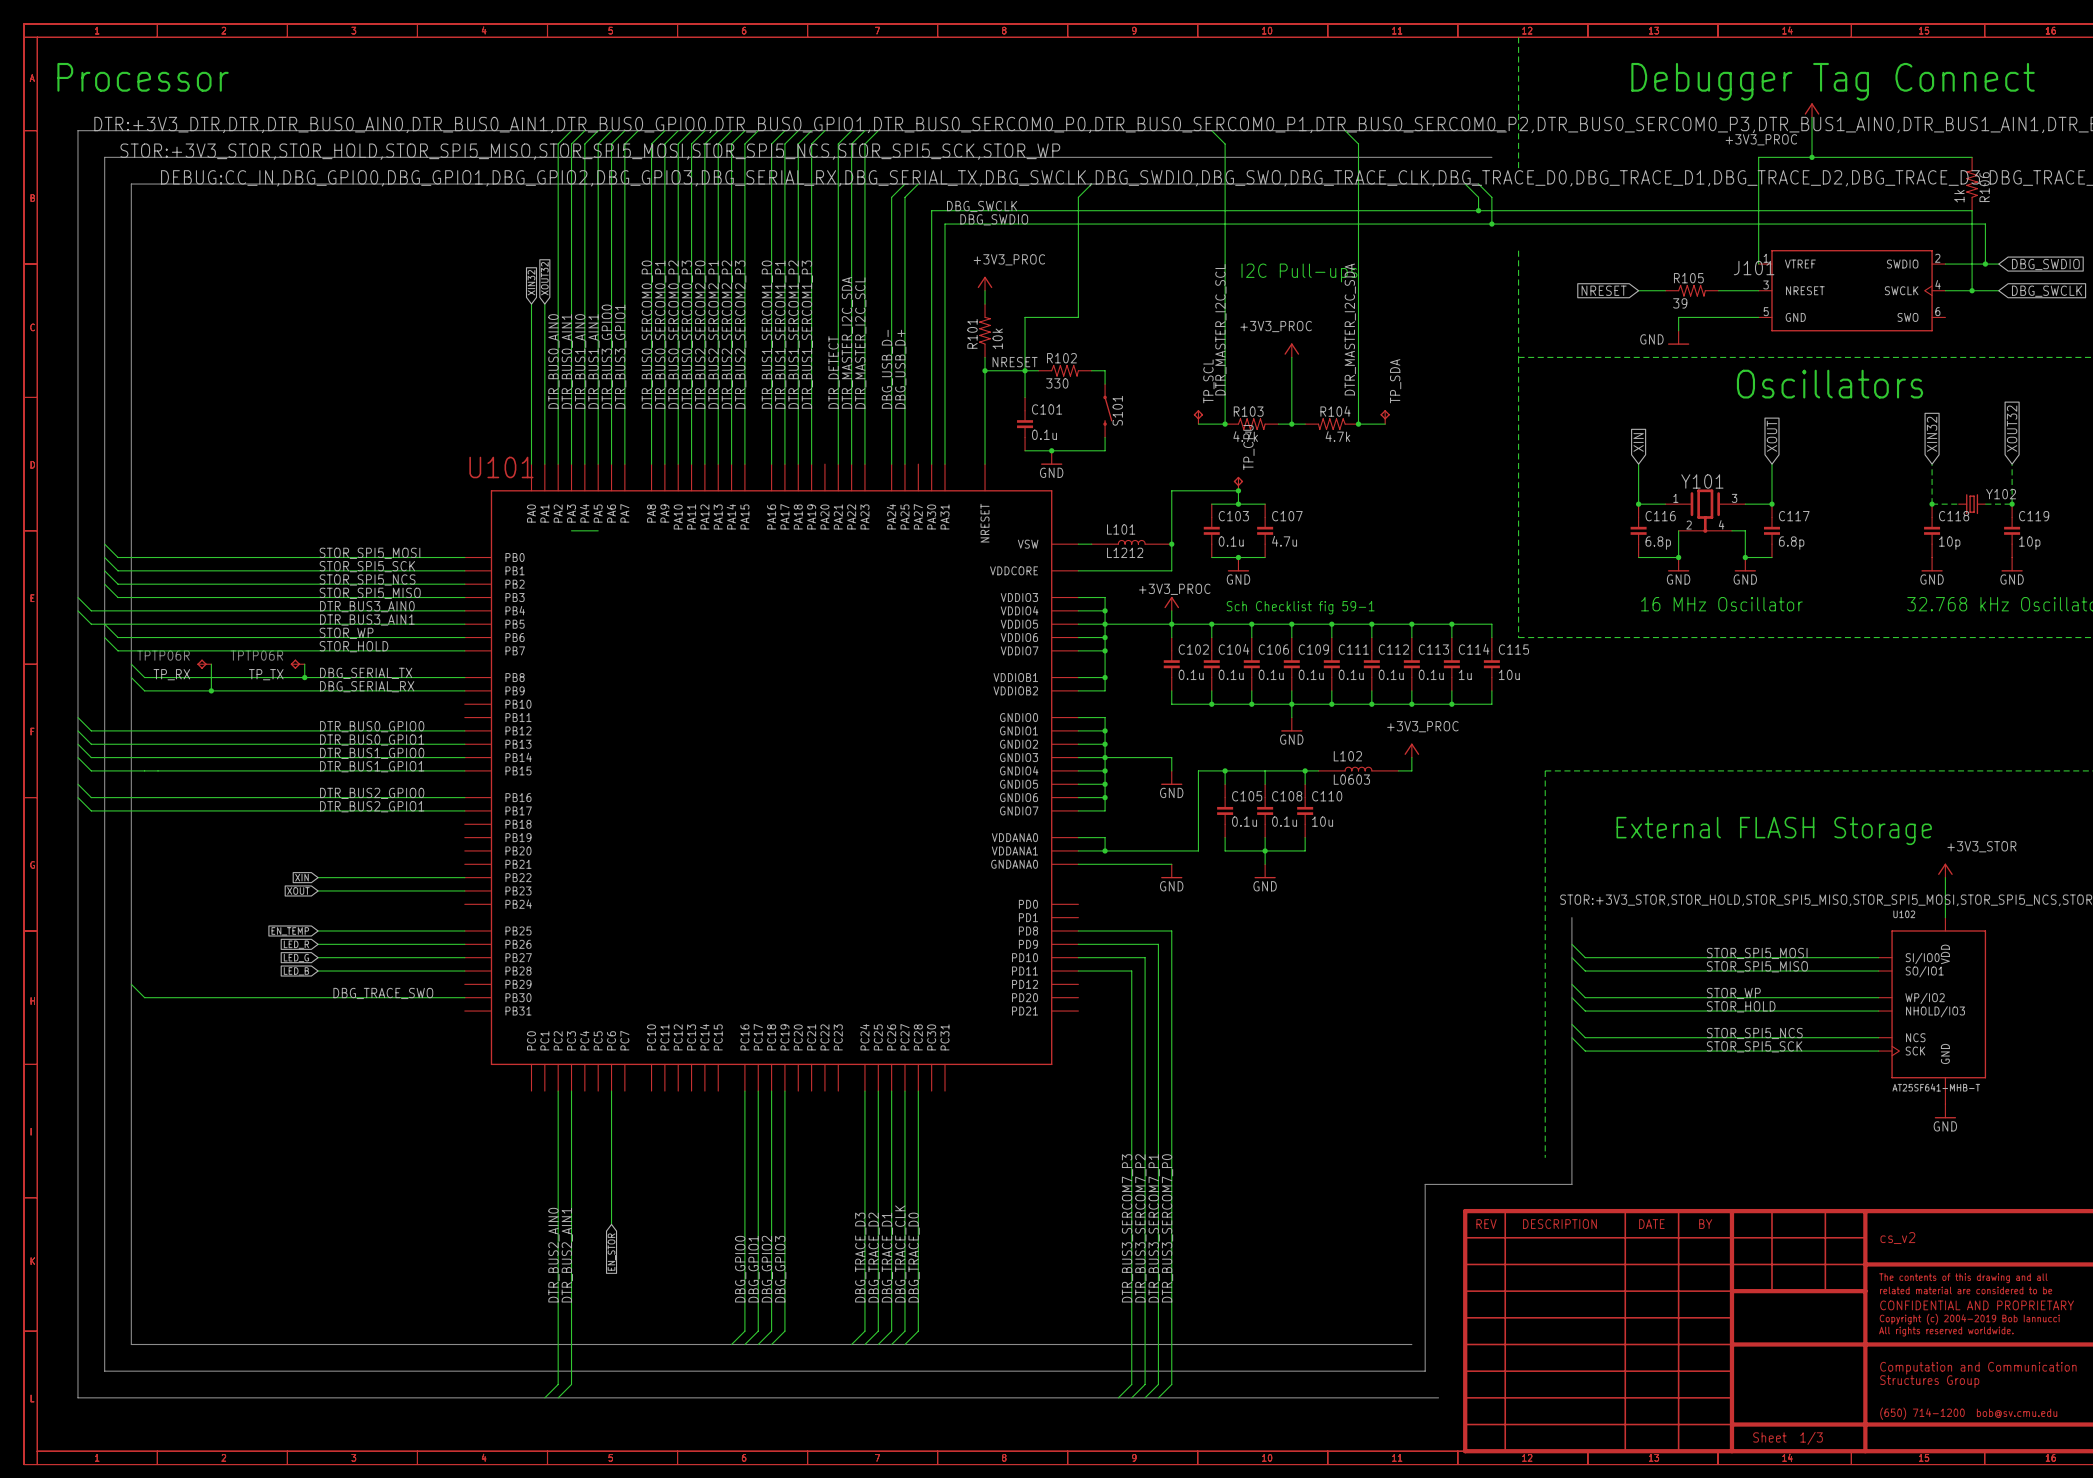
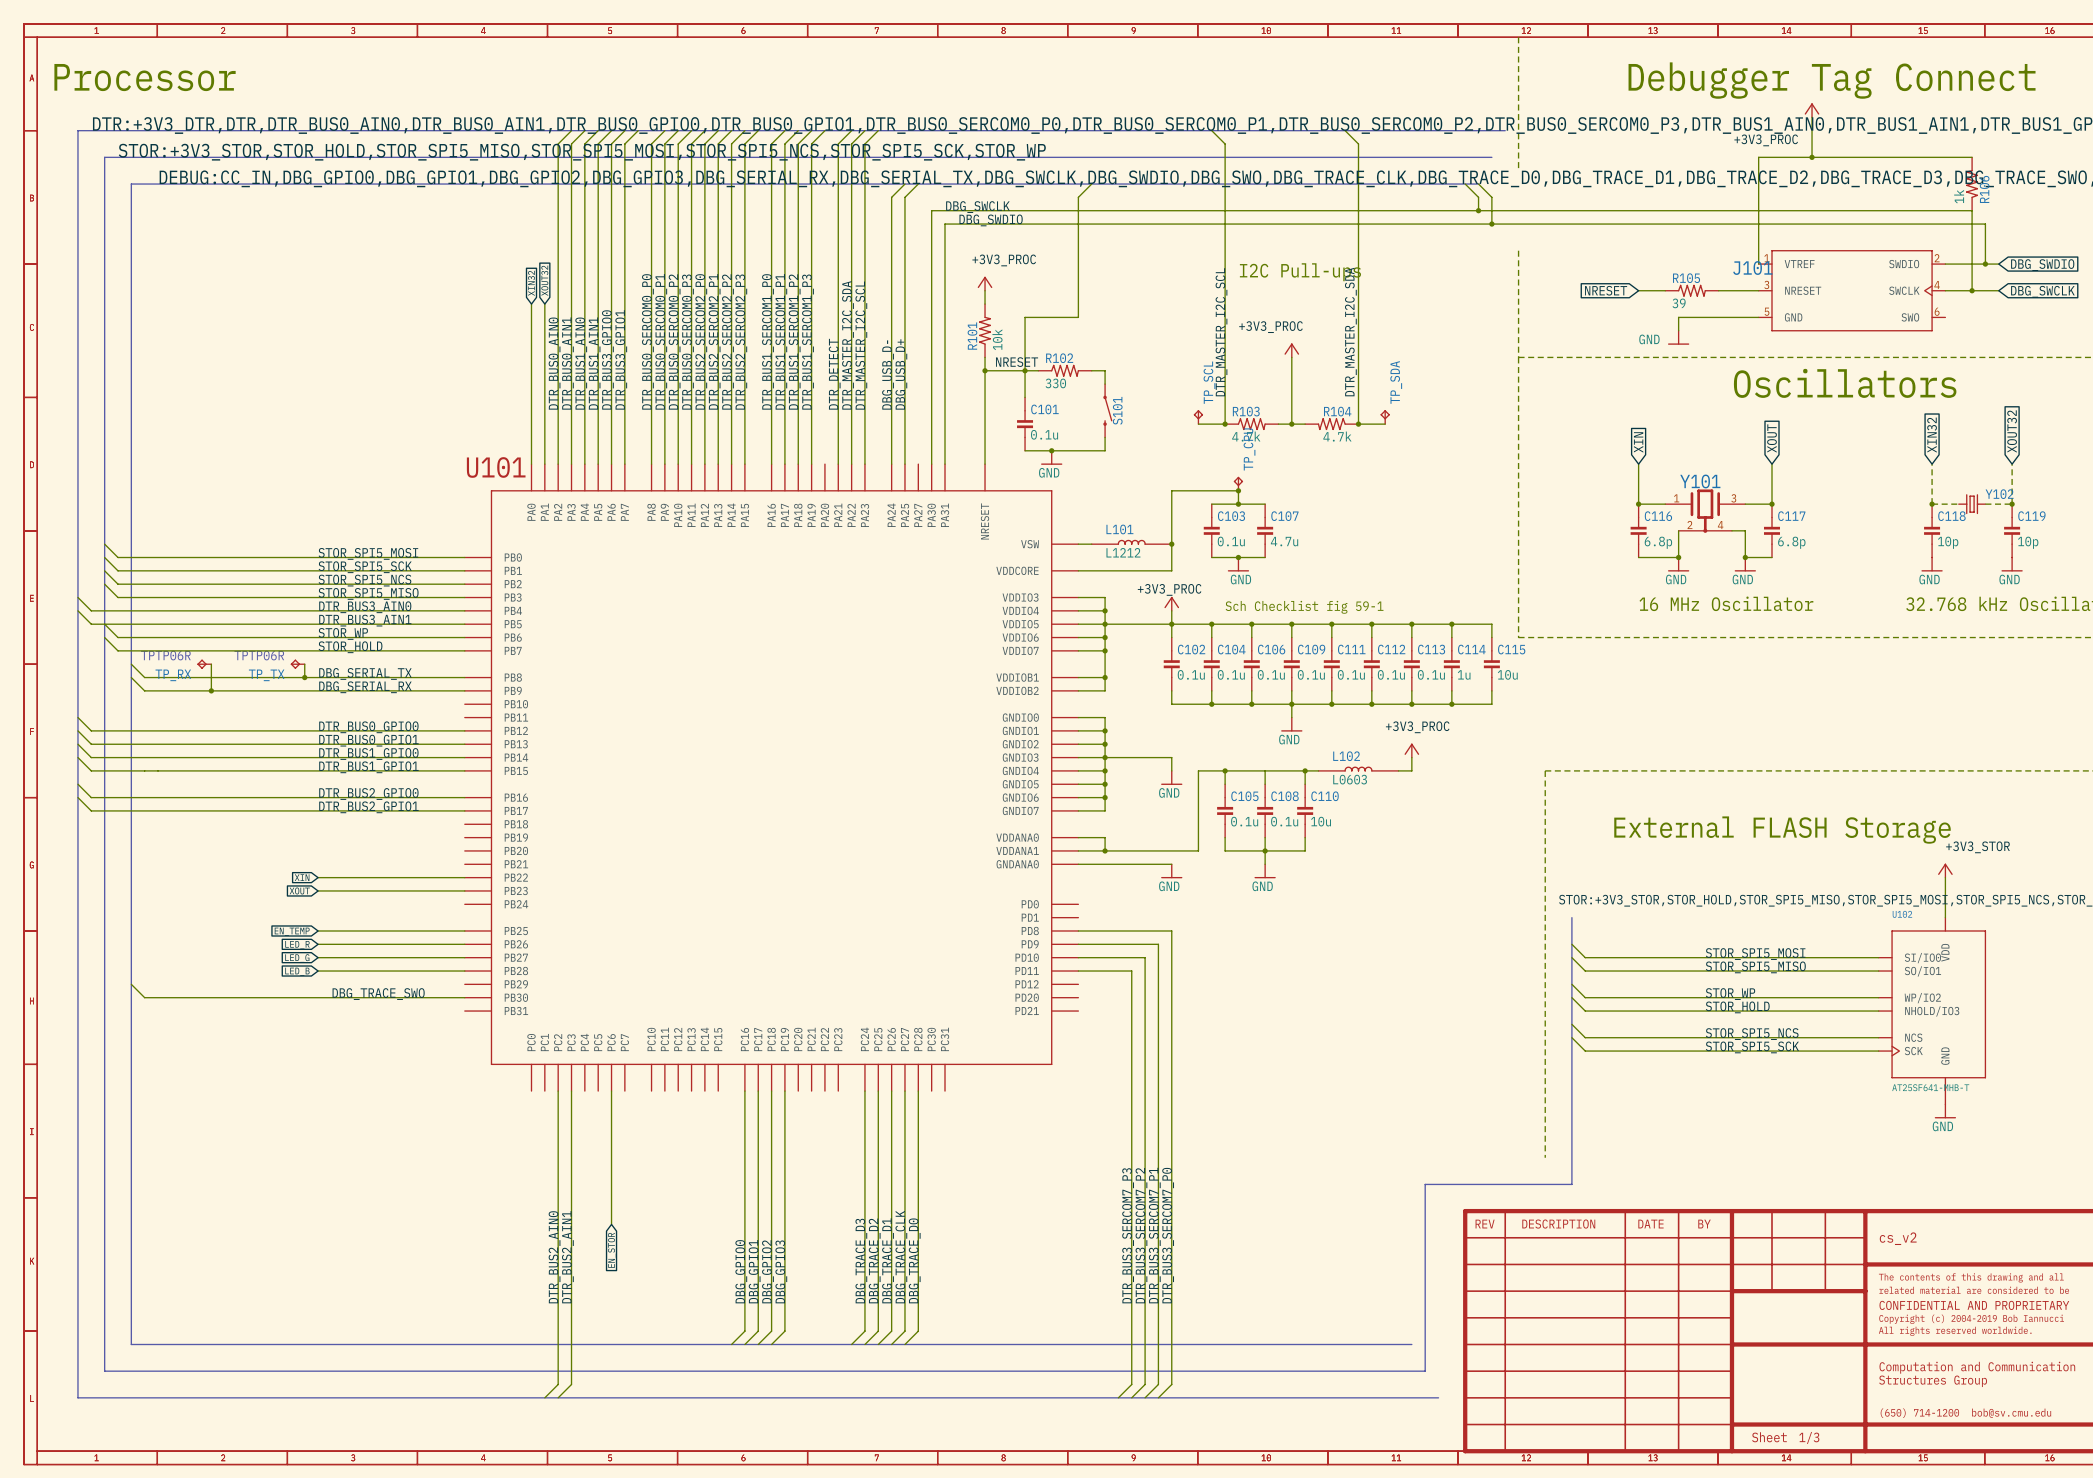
wire: (571, 530) (598, 530) -> none

